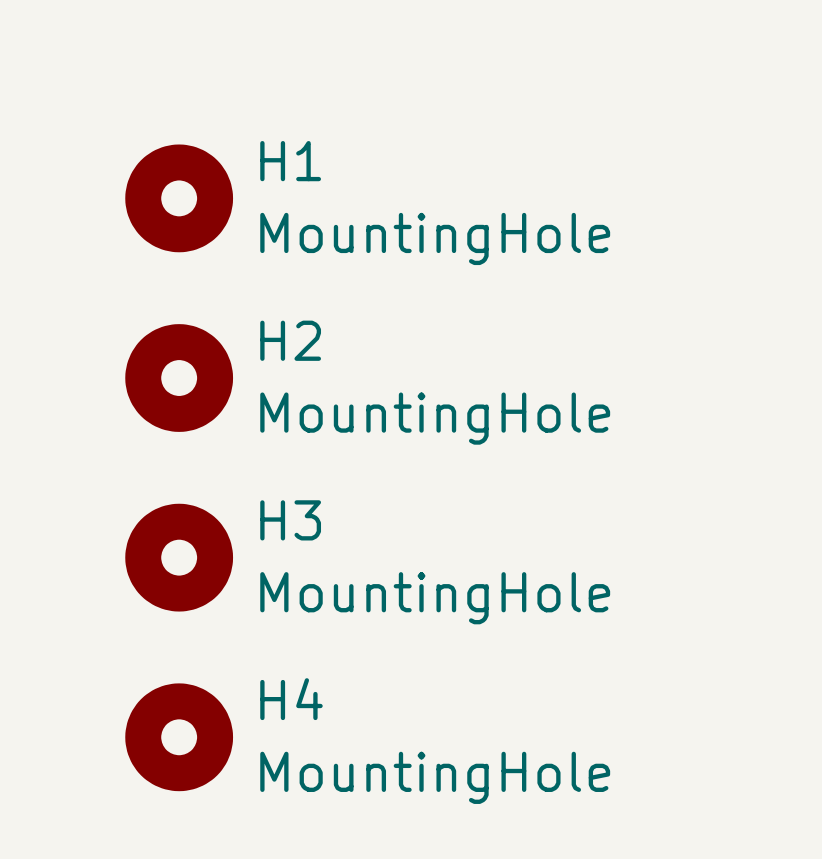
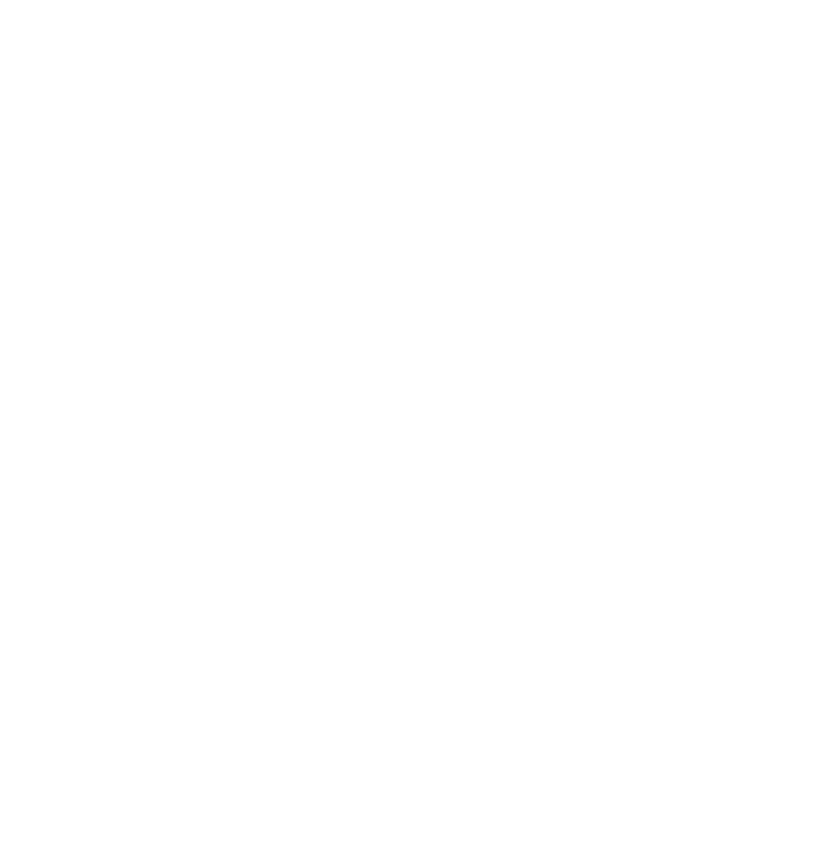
H1: MountingHole (179, 198) -> none
H2: MountingHole (179, 378) -> none
H3: MountingHole (179, 557) -> none
H4: MountingHole (179, 737) -> none

